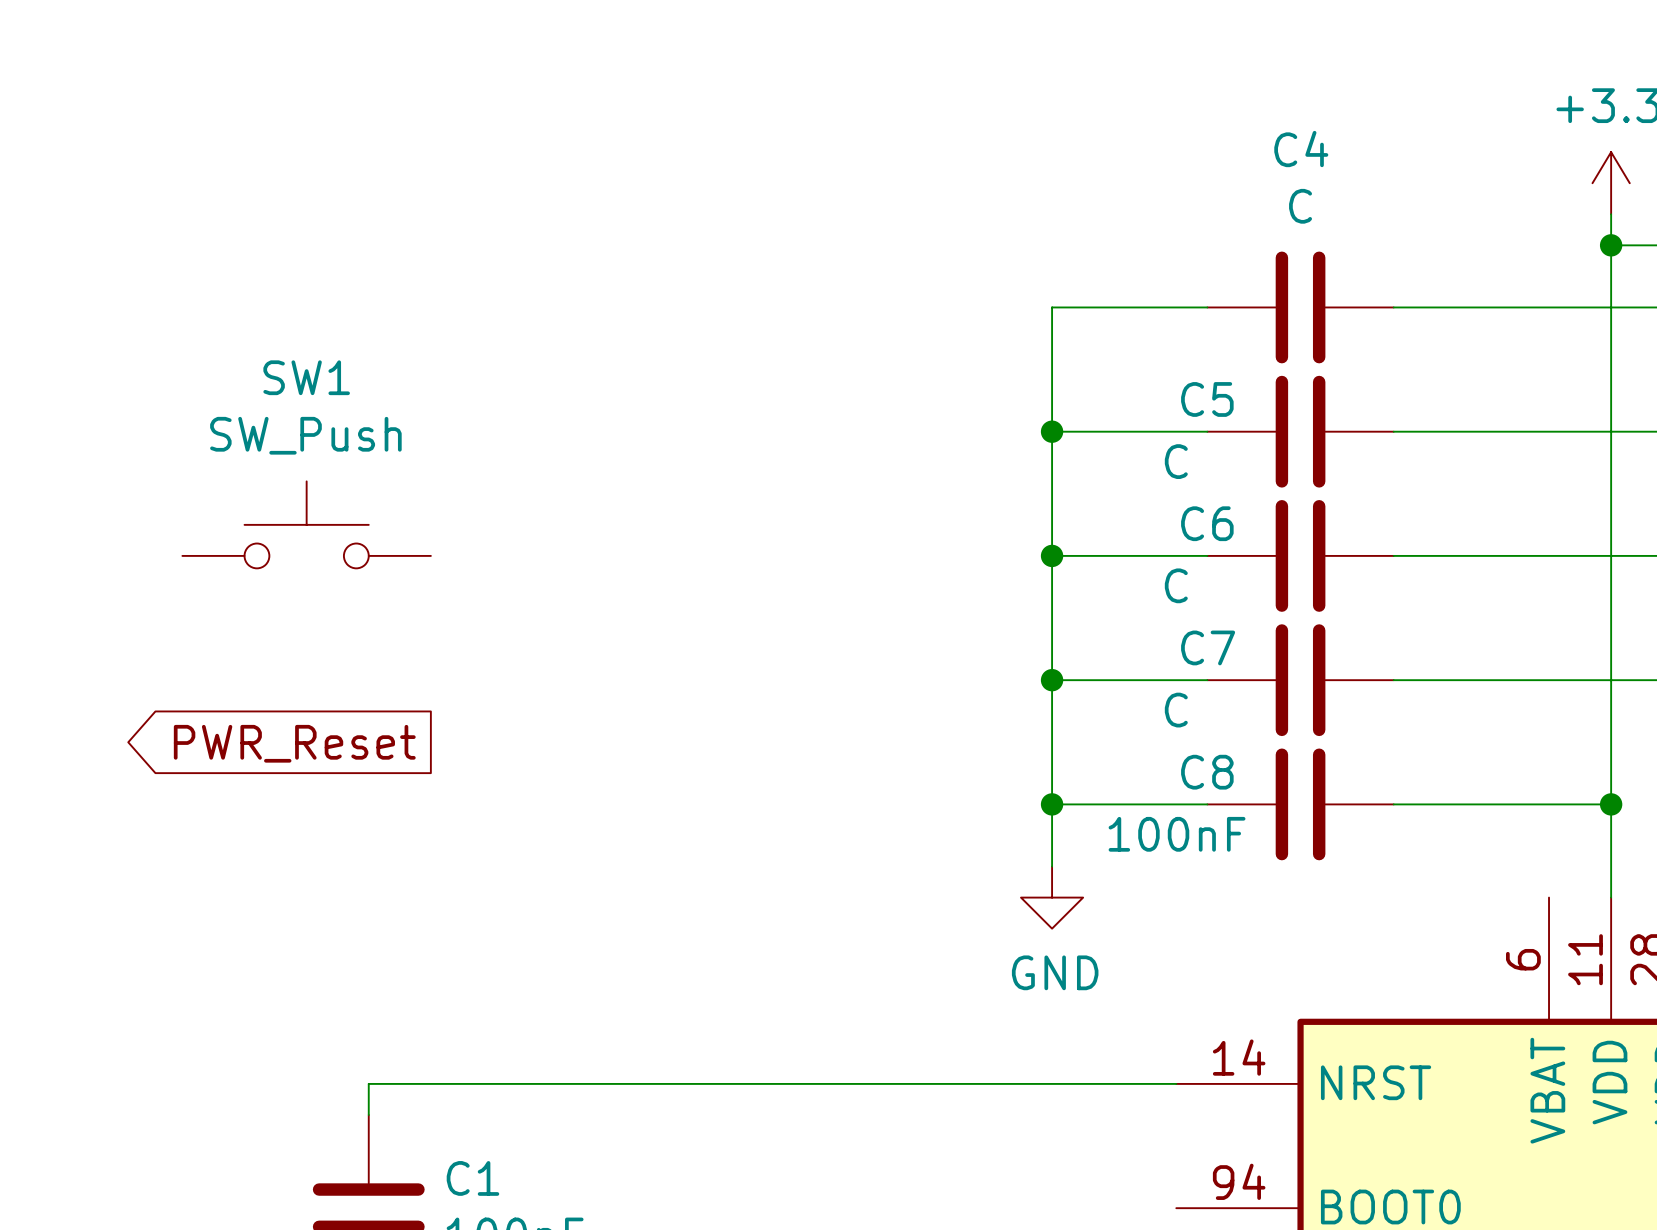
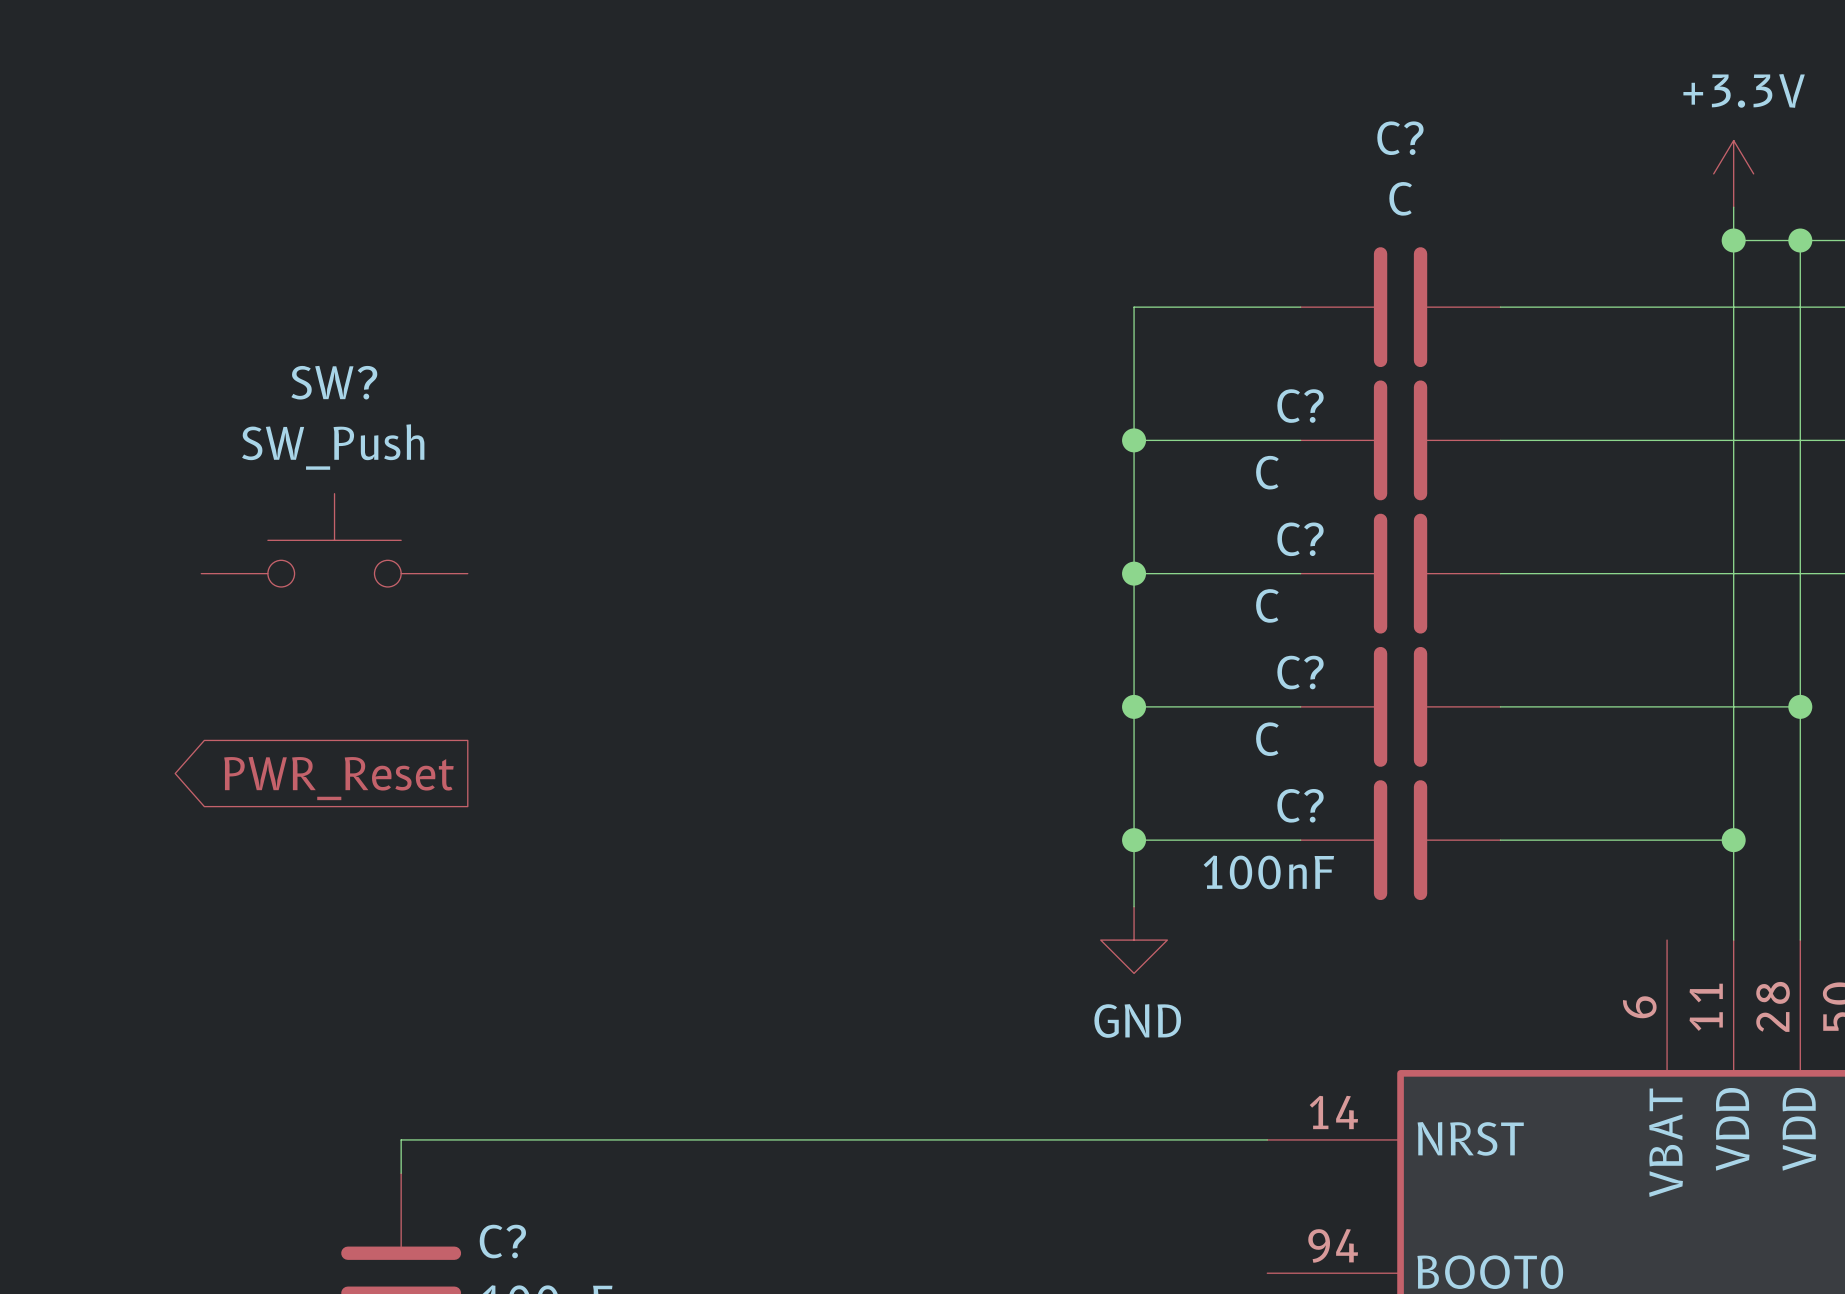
C4 name: C4 (1301, 149) -> C? (1400, 138)
SW1 name: SW1 (306, 377) -> SW? (334, 382)
C5 name: C5 (1207, 399) -> C? (1300, 406)
C6 name: C6 (1207, 523) -> C? (1300, 539)
C7 name: C7 (1208, 647) -> C? (1300, 672)
C8 name: C8 (1207, 772) -> C? (1300, 805)
C1 name: C1 (472, 1178) -> C? (502, 1241)

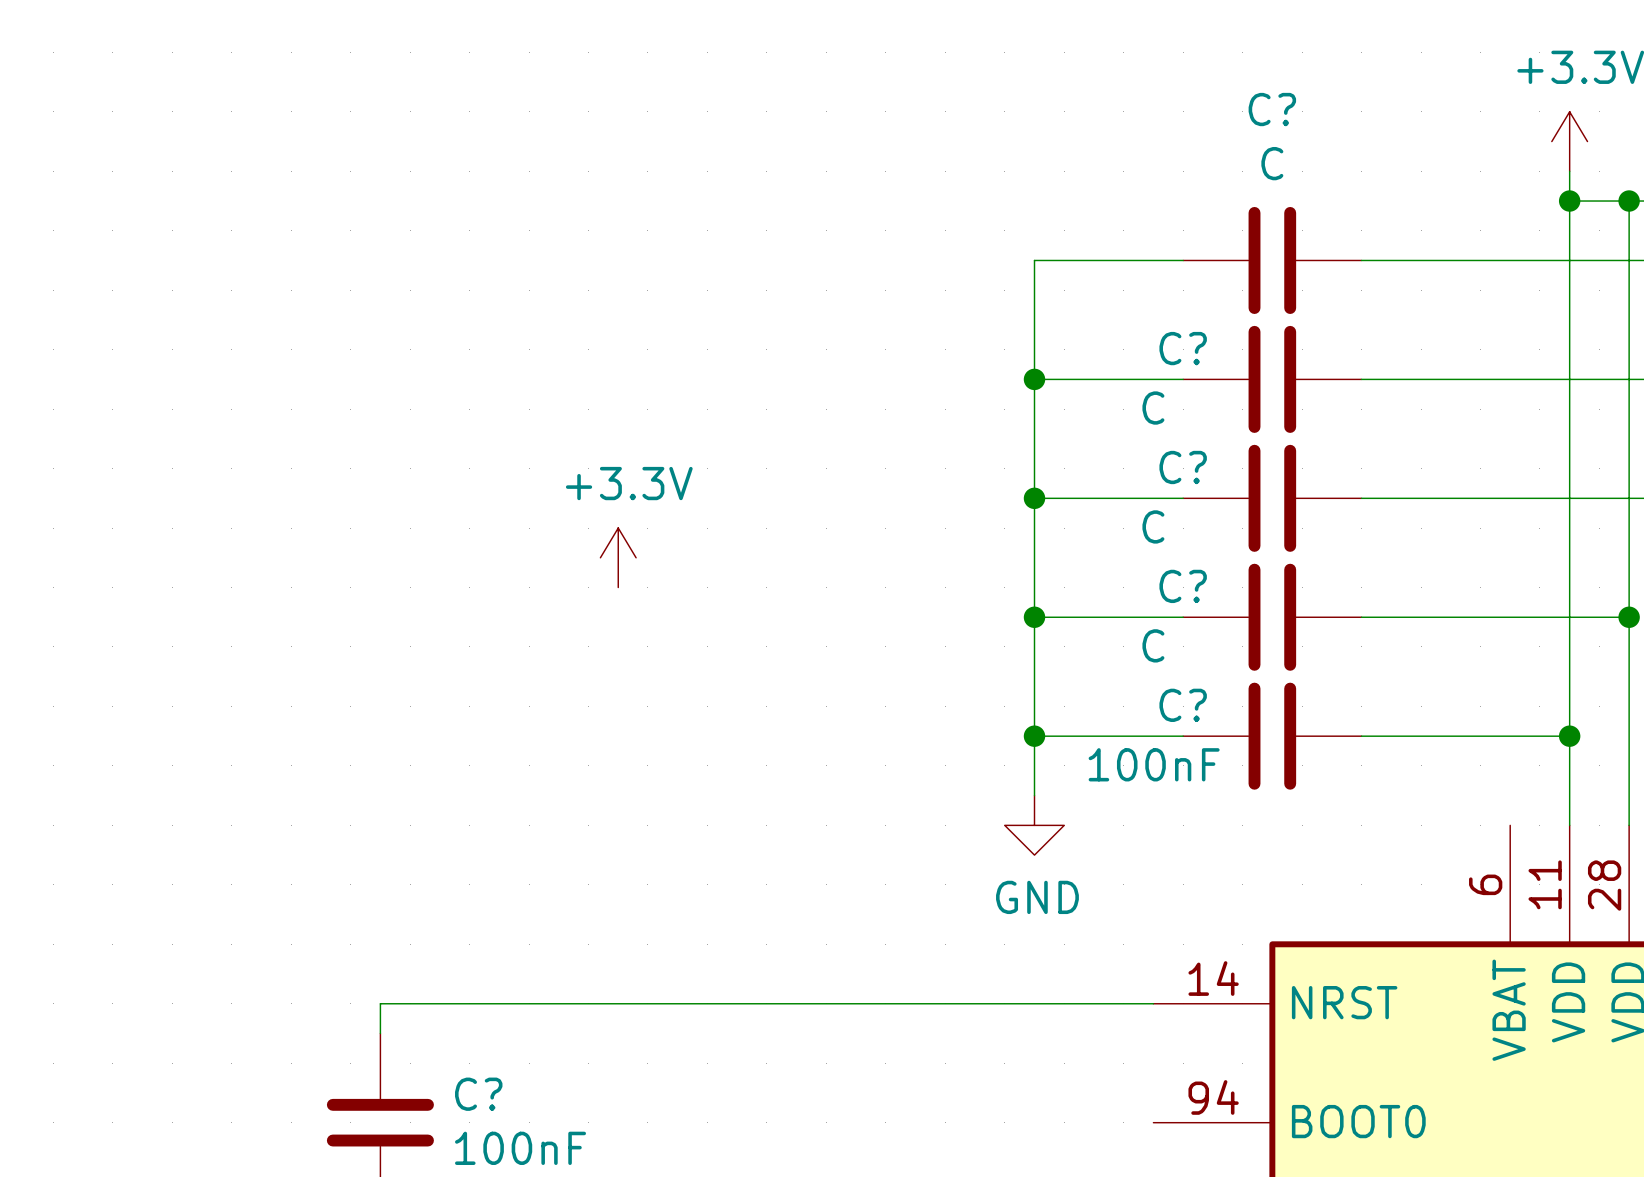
SW?: SW_Push (334, 540) -> none
power symbol: none -> +3.3V (618, 557)
global label: PWR_Reset (338, 778) -> none

